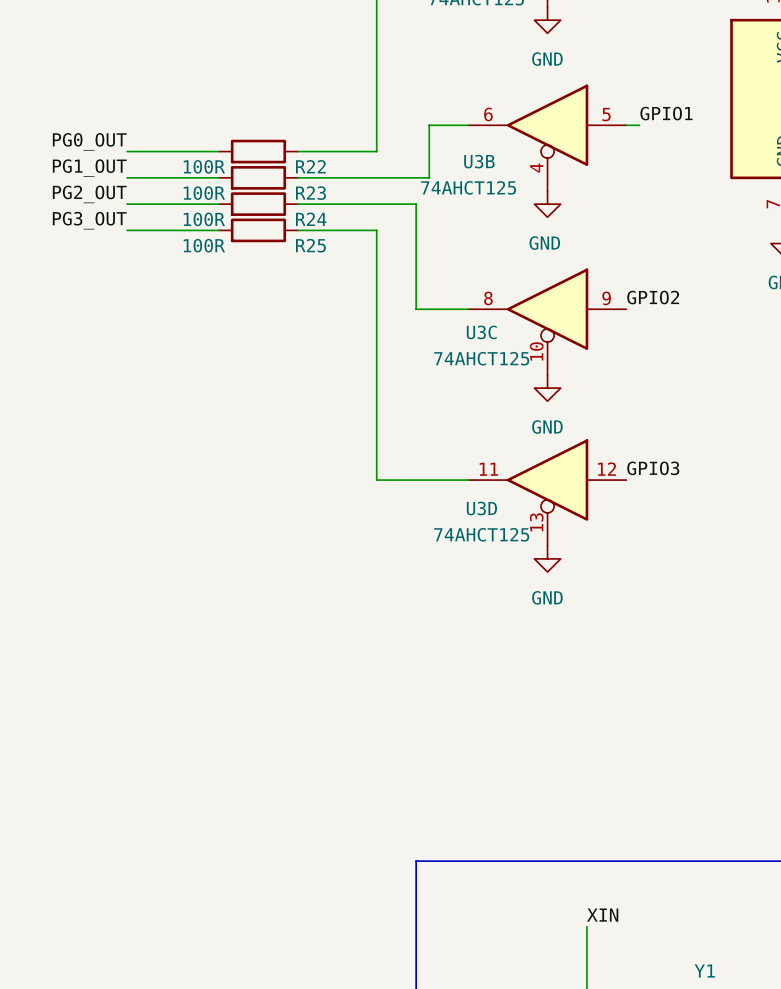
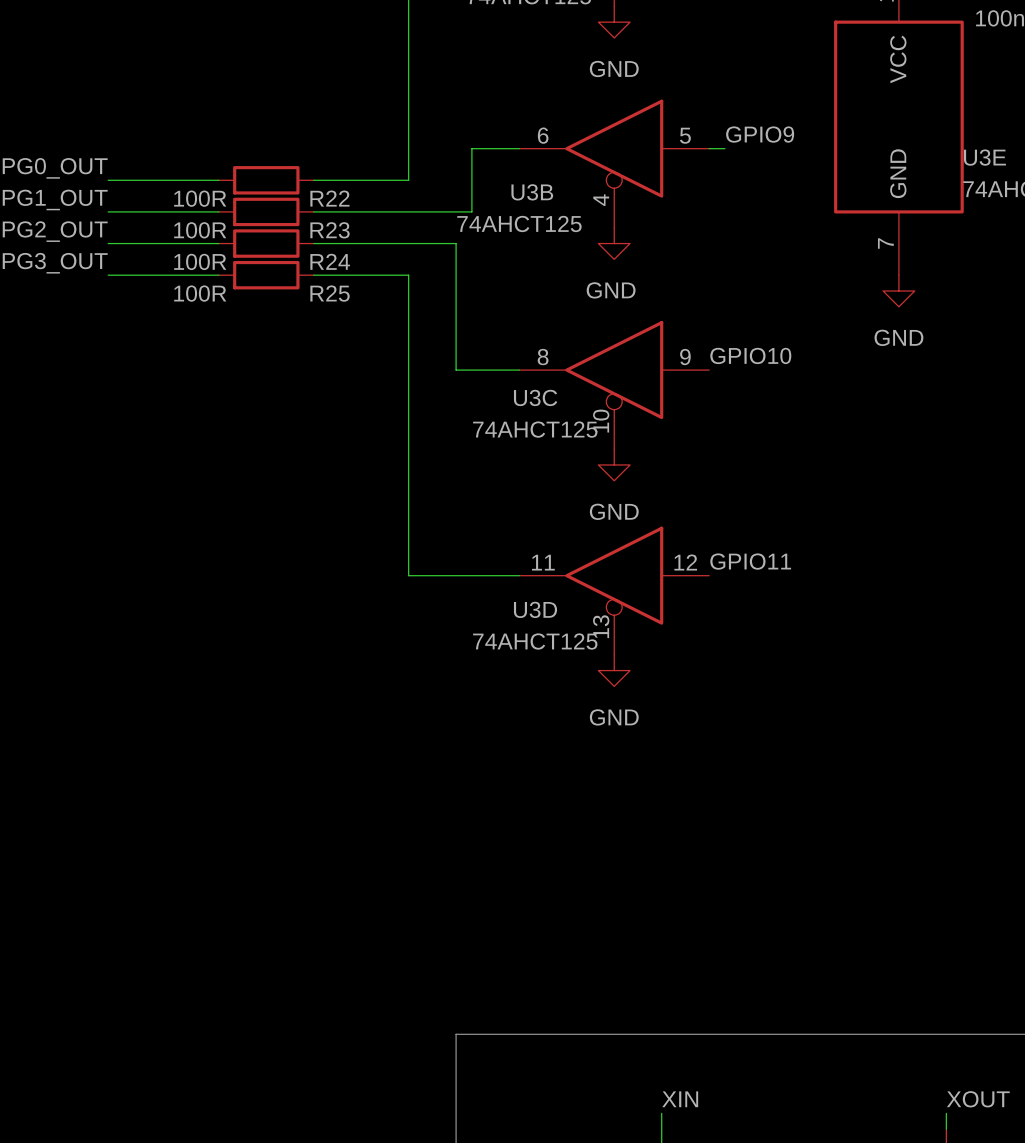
label: GPIO1 (666, 113) -> GPIO9 (760, 134)
label: GPIO2 (653, 297) -> GPIO10 (750, 355)
label: GPIO3 (653, 468) -> GPIO11 (750, 561)

